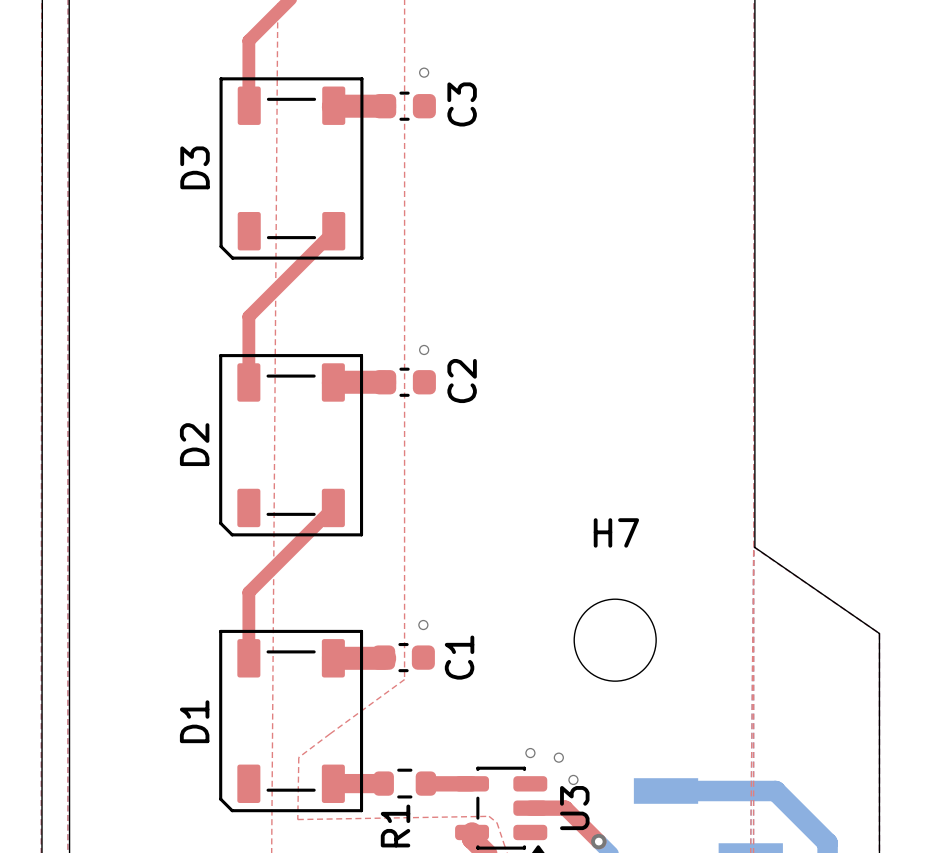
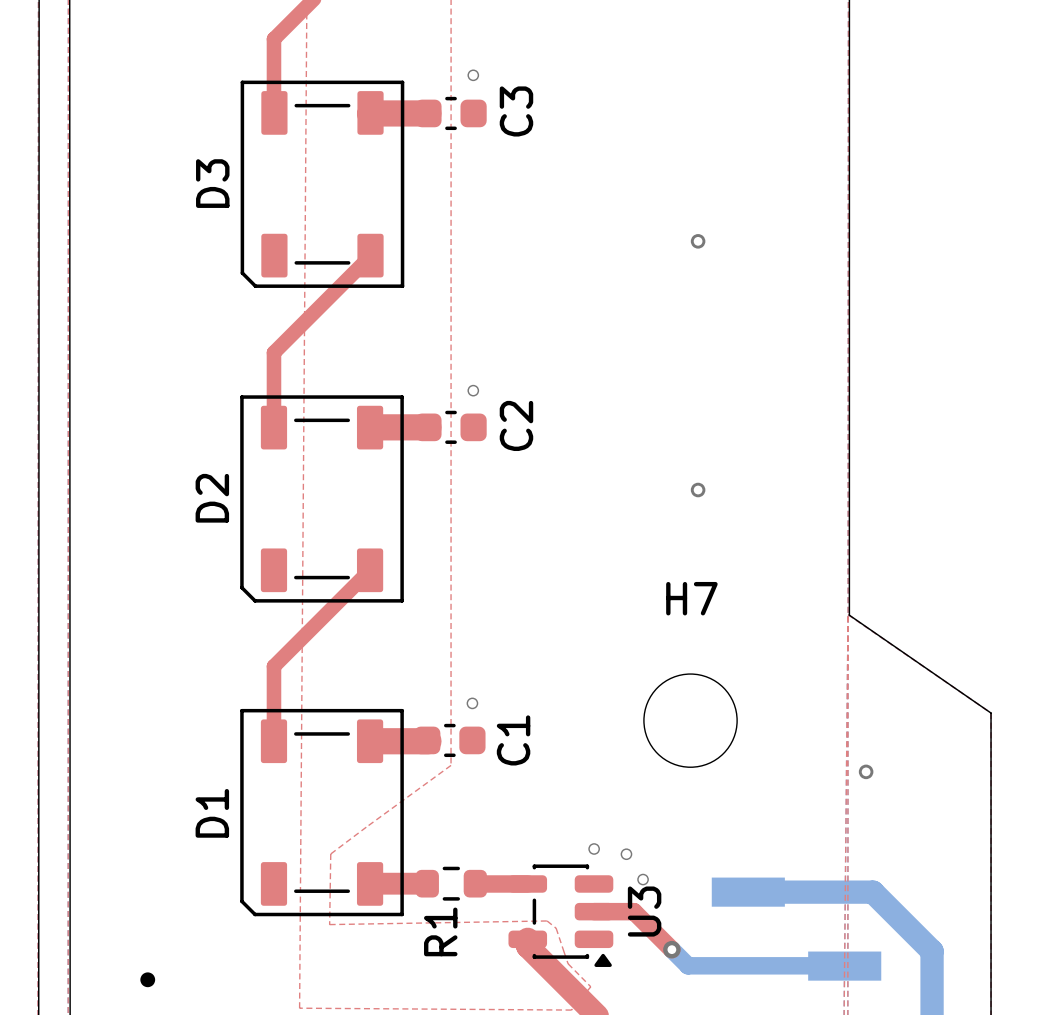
via: none -> (698, 241)
via: none -> (698, 490)
via: none -> (866, 771)

